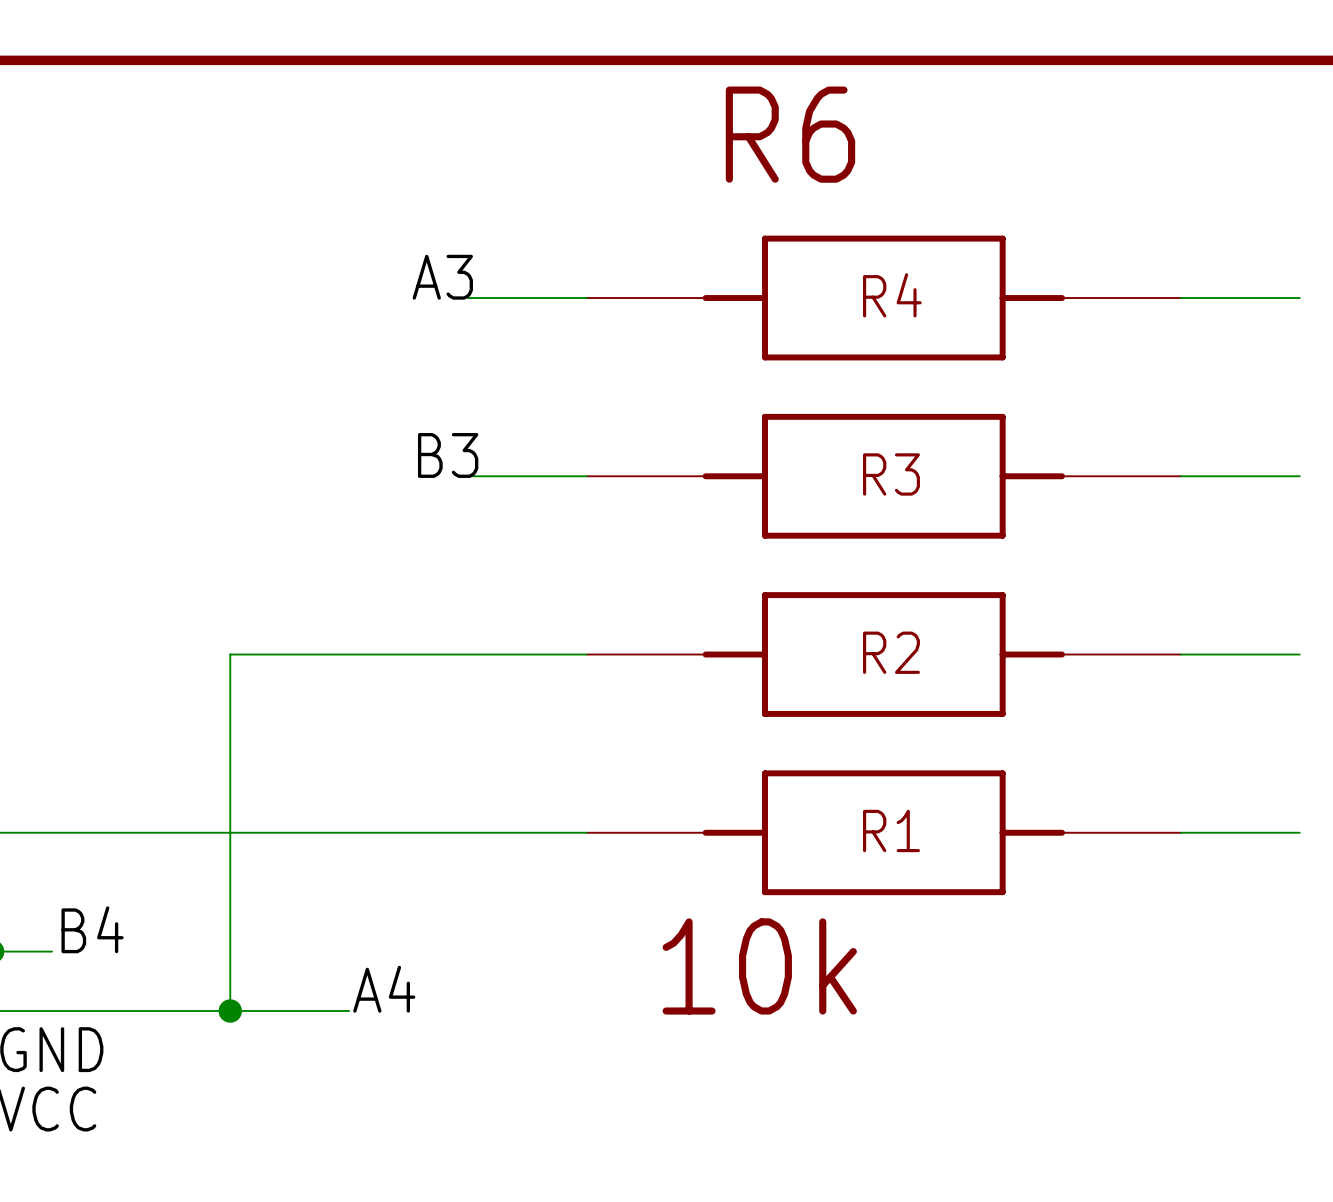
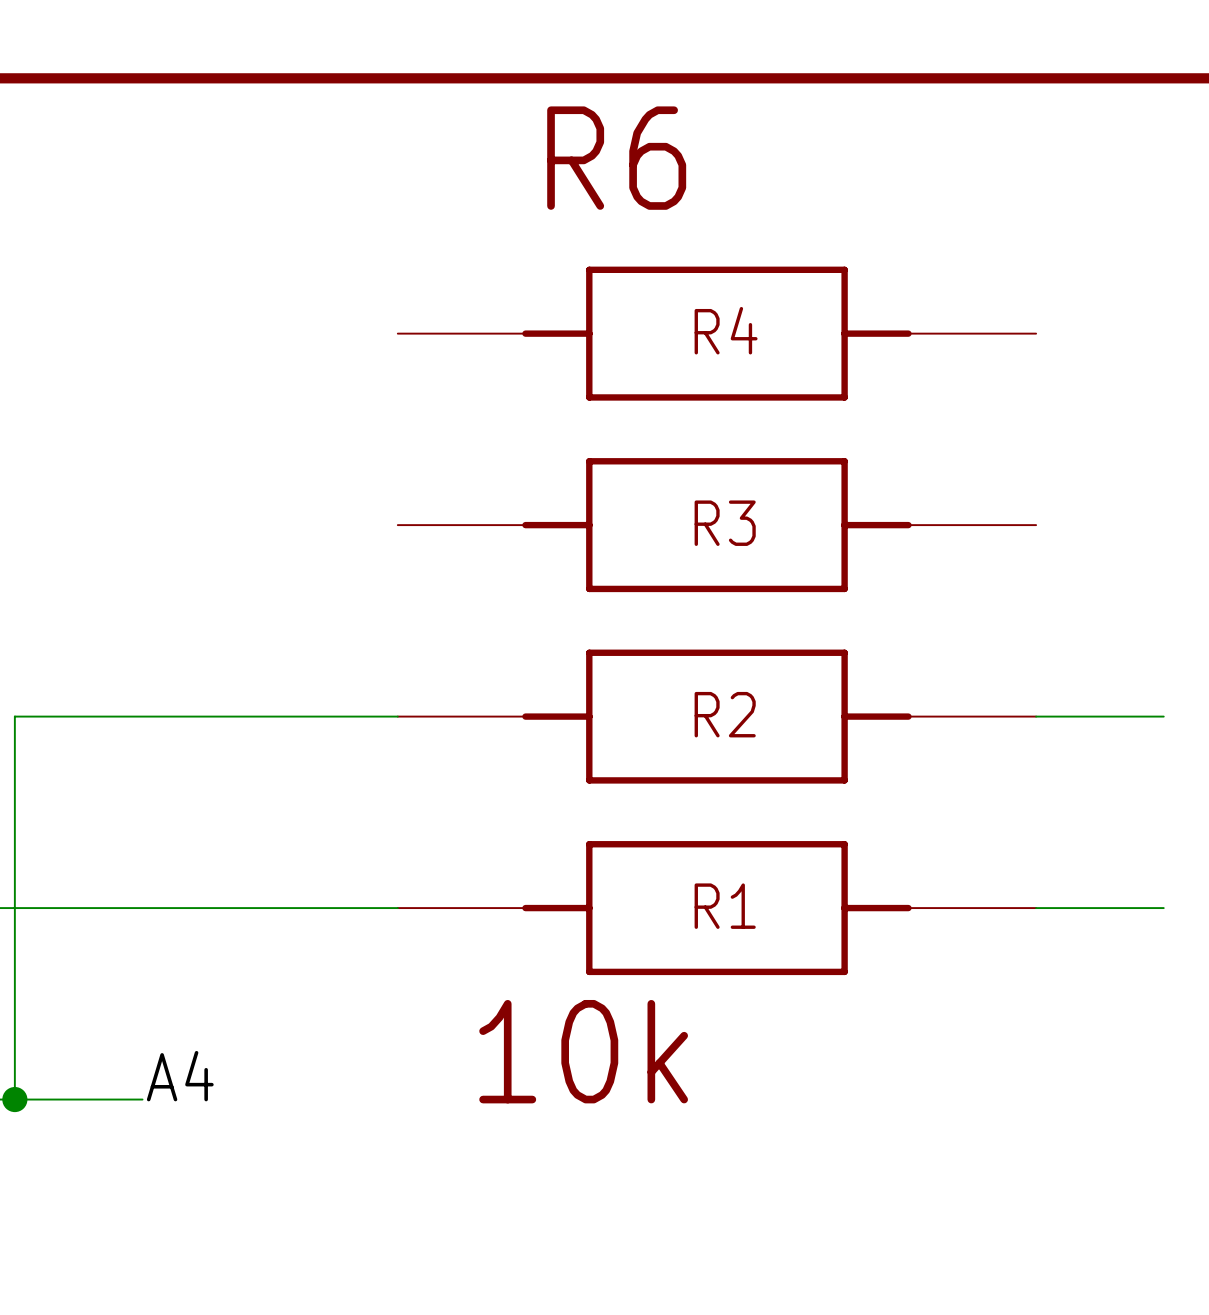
label: A3 (442, 277) -> none
wire: (467, 298) (586, 298) -> none
wire: (1180, 298) (1299, 298) -> none
label: B3 (448, 455) -> none
wire: (467, 476) (586, 476) -> none
wire: (1180, 476) (1299, 476) -> none

